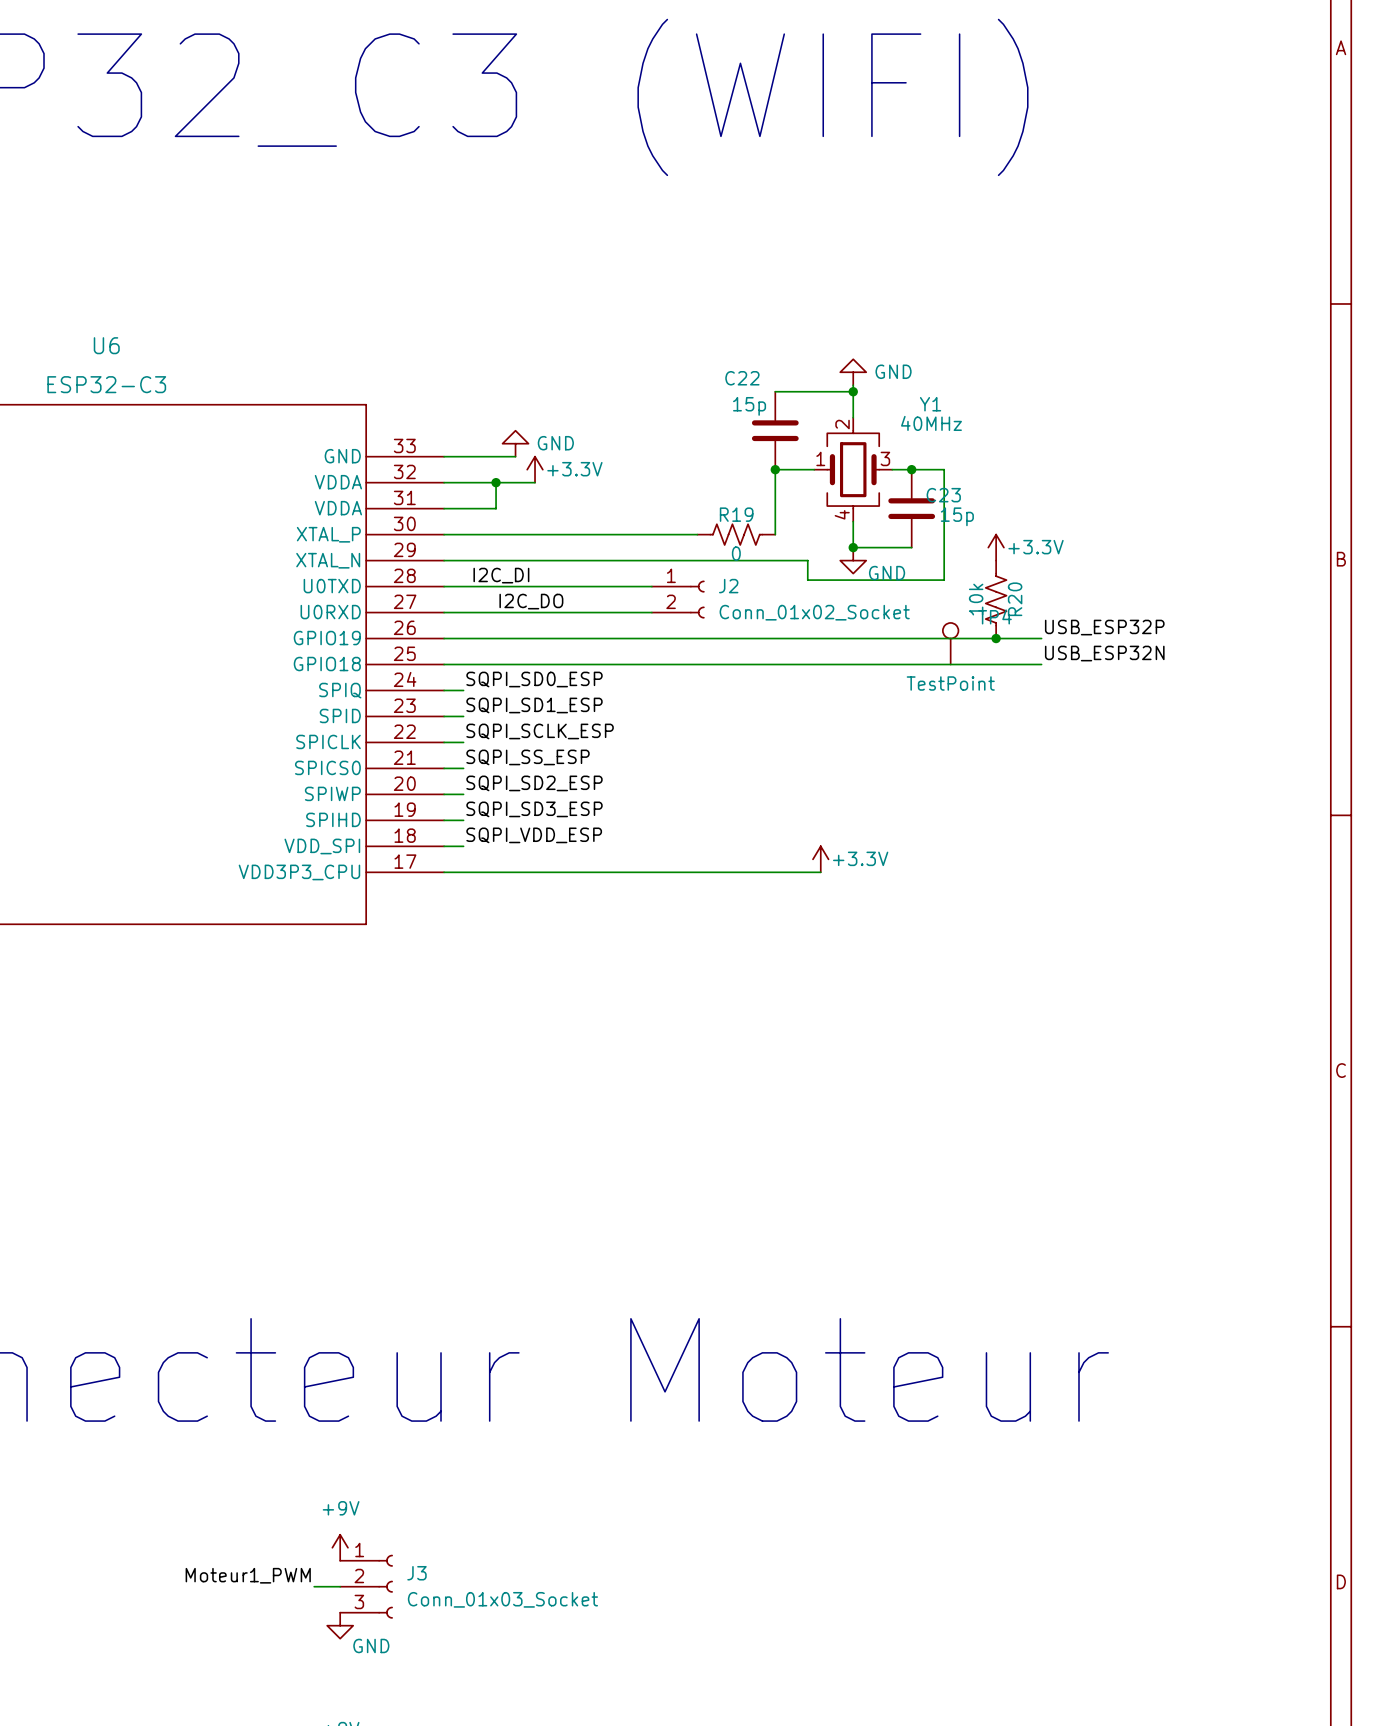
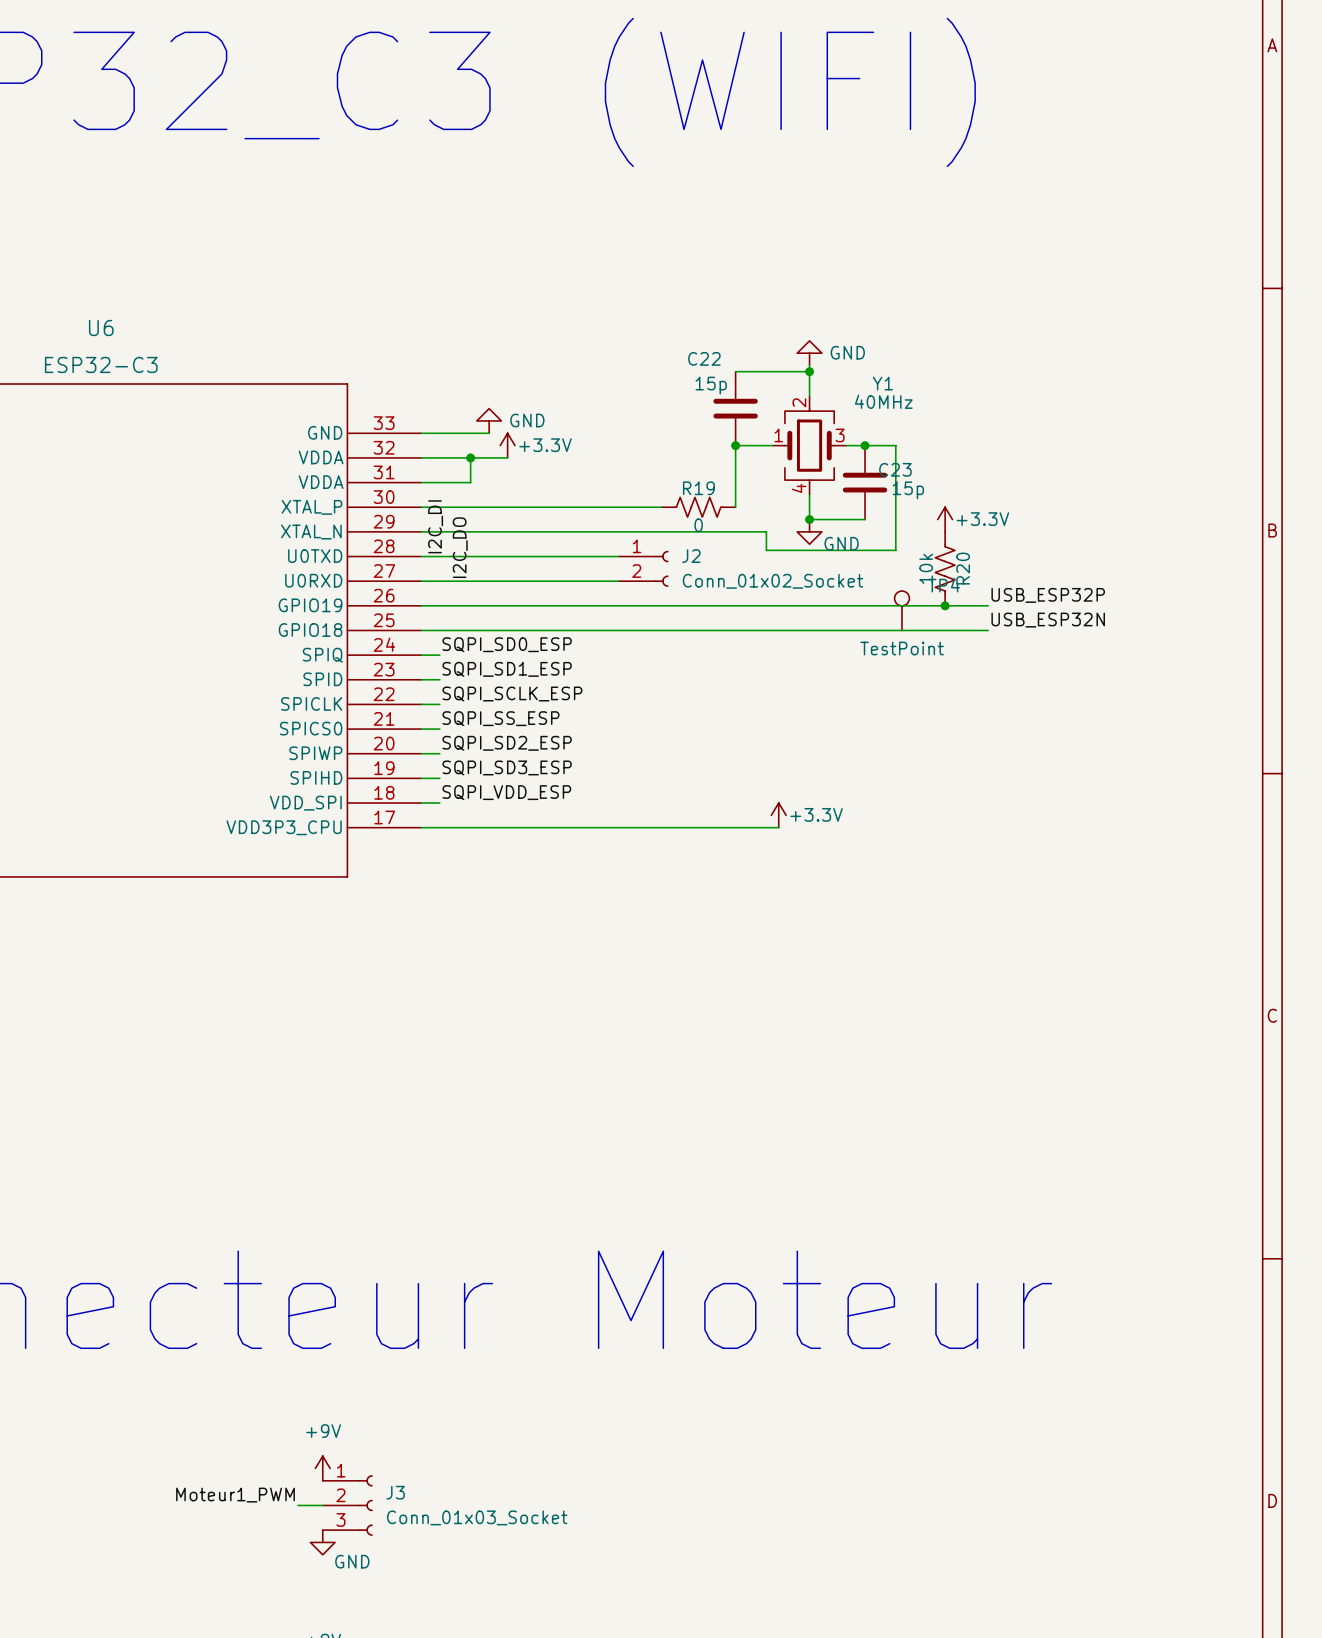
label rotation: 0° (501, 575) -> 90° counterclockwise (435, 526)
label rotation: 0° (531, 601) -> 90° counterclockwise (460, 547)

